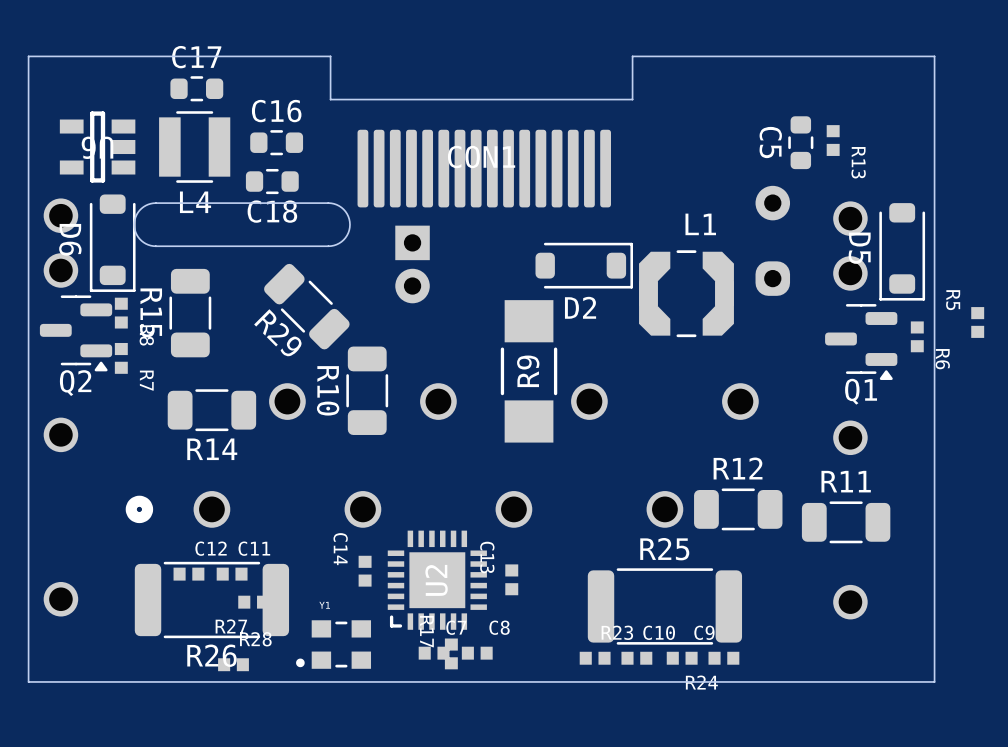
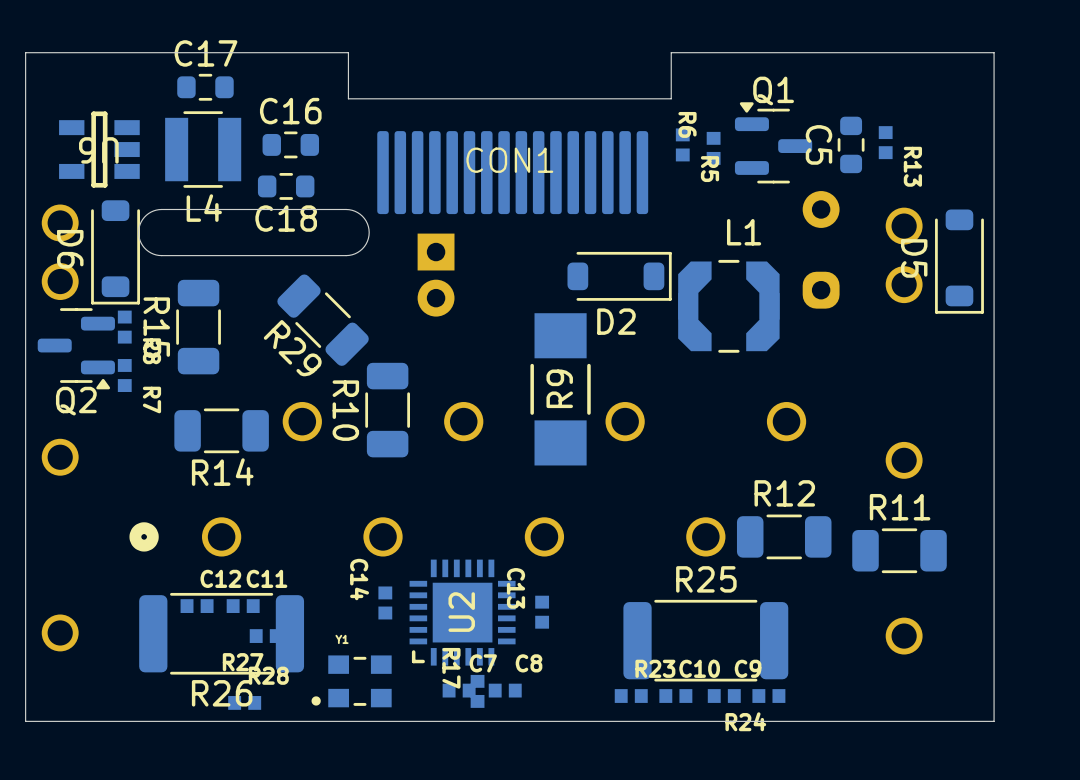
R5 name position: R5 (953, 300) -> R5 (709, 169)
R5 position: (977, 322) -> (682, 144)
R6 position: (917, 336) -> (713, 148)
Q1 rotation: 0° (861, 342) -> 180° (773, 142)
Q1 position: (861, 342) -> (773, 142)
R6 name position: R6 (942, 359) -> R6 (687, 124)

